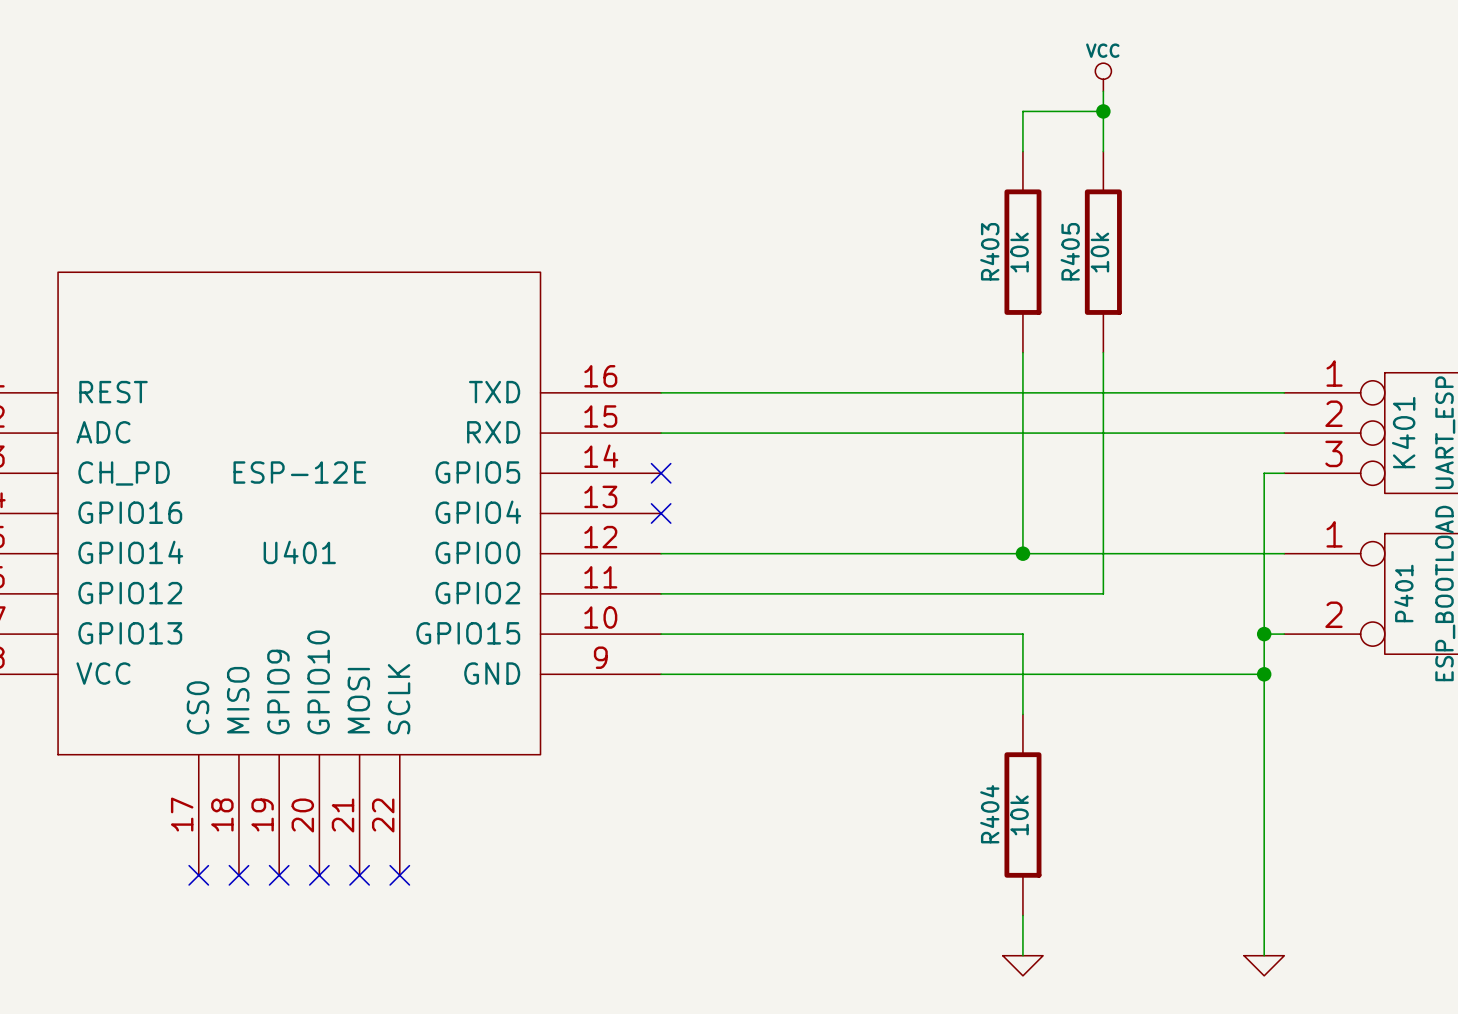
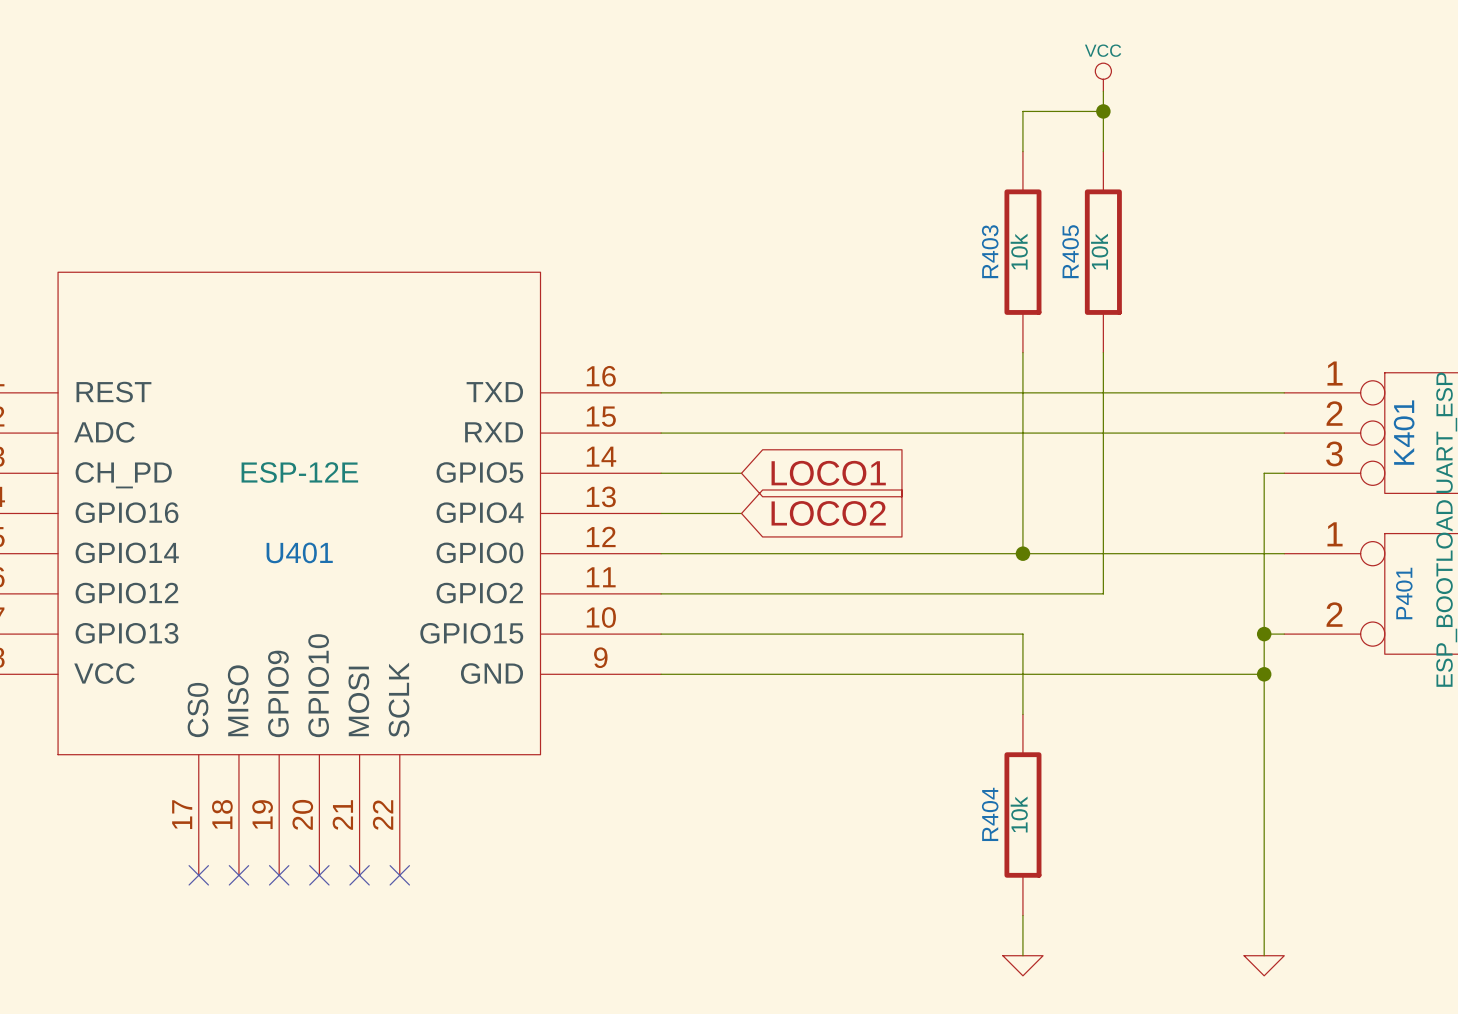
wire: none -> (661, 473) (741, 473)
no-connect mark: (661, 473) -> none
global label: none -> LOCO1 (828, 473)
wire: none -> (661, 513) (741, 513)
no-connect mark: (661, 513) -> none
global label: none -> LOCO2 (828, 513)

